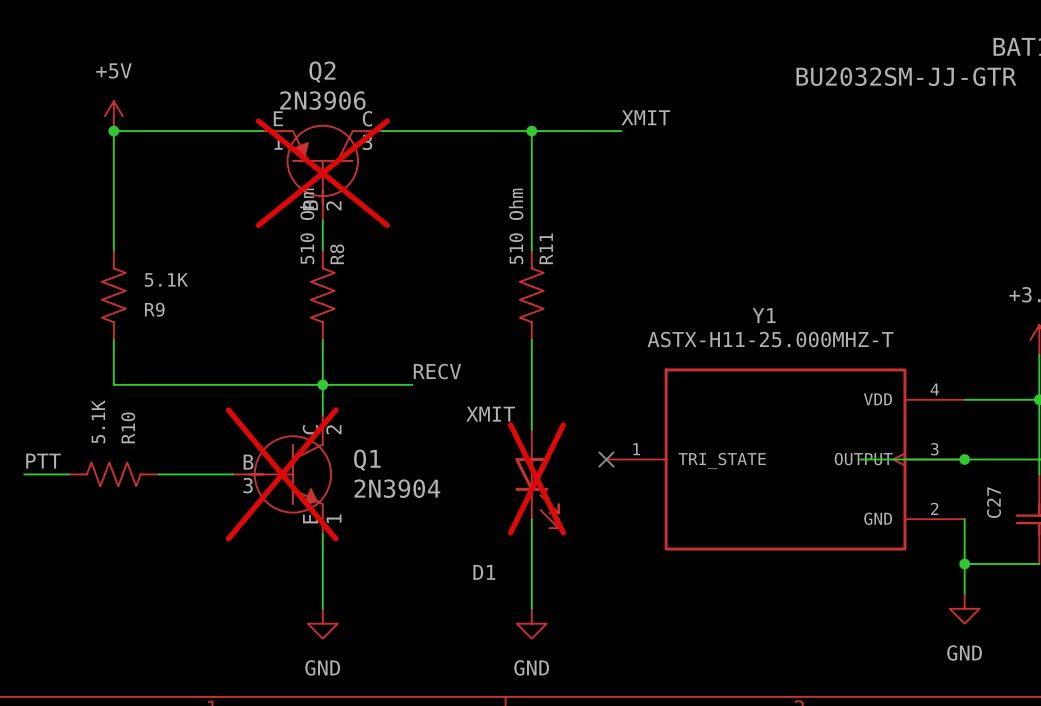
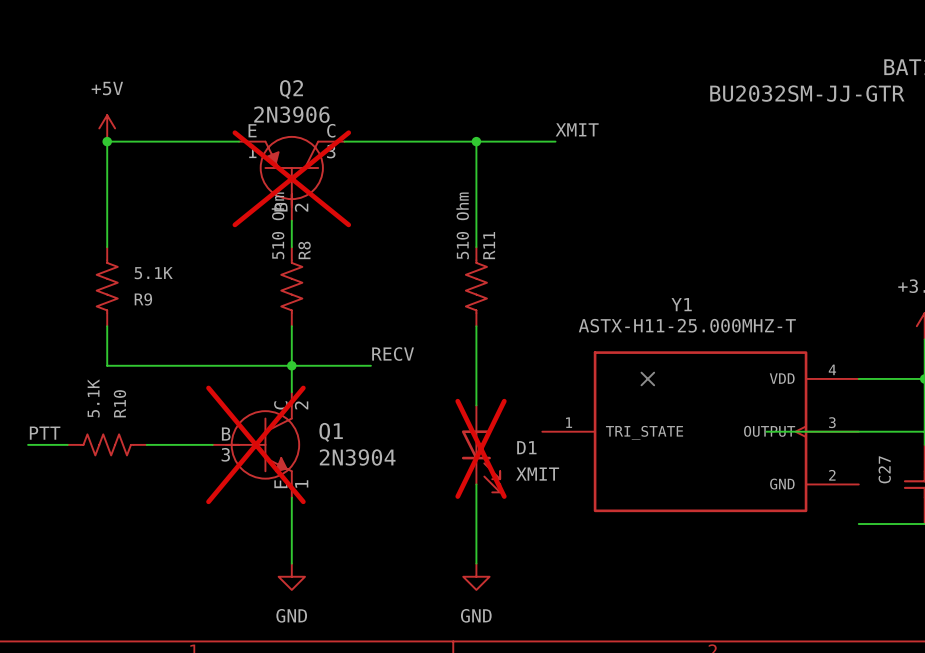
no-connect mark: none -> (647, 378)
D1 value position: XMIT (490, 414) -> XMIT (537, 474)
no-connect mark: (606, 459) -> none
junction: (964, 459) -> none
wire: (964, 519) (964, 593) -> none
junction: (964, 563) -> none
D1 name position: D1 (484, 572) -> D1 (526, 447)
power symbol: GND (964, 608) -> none

